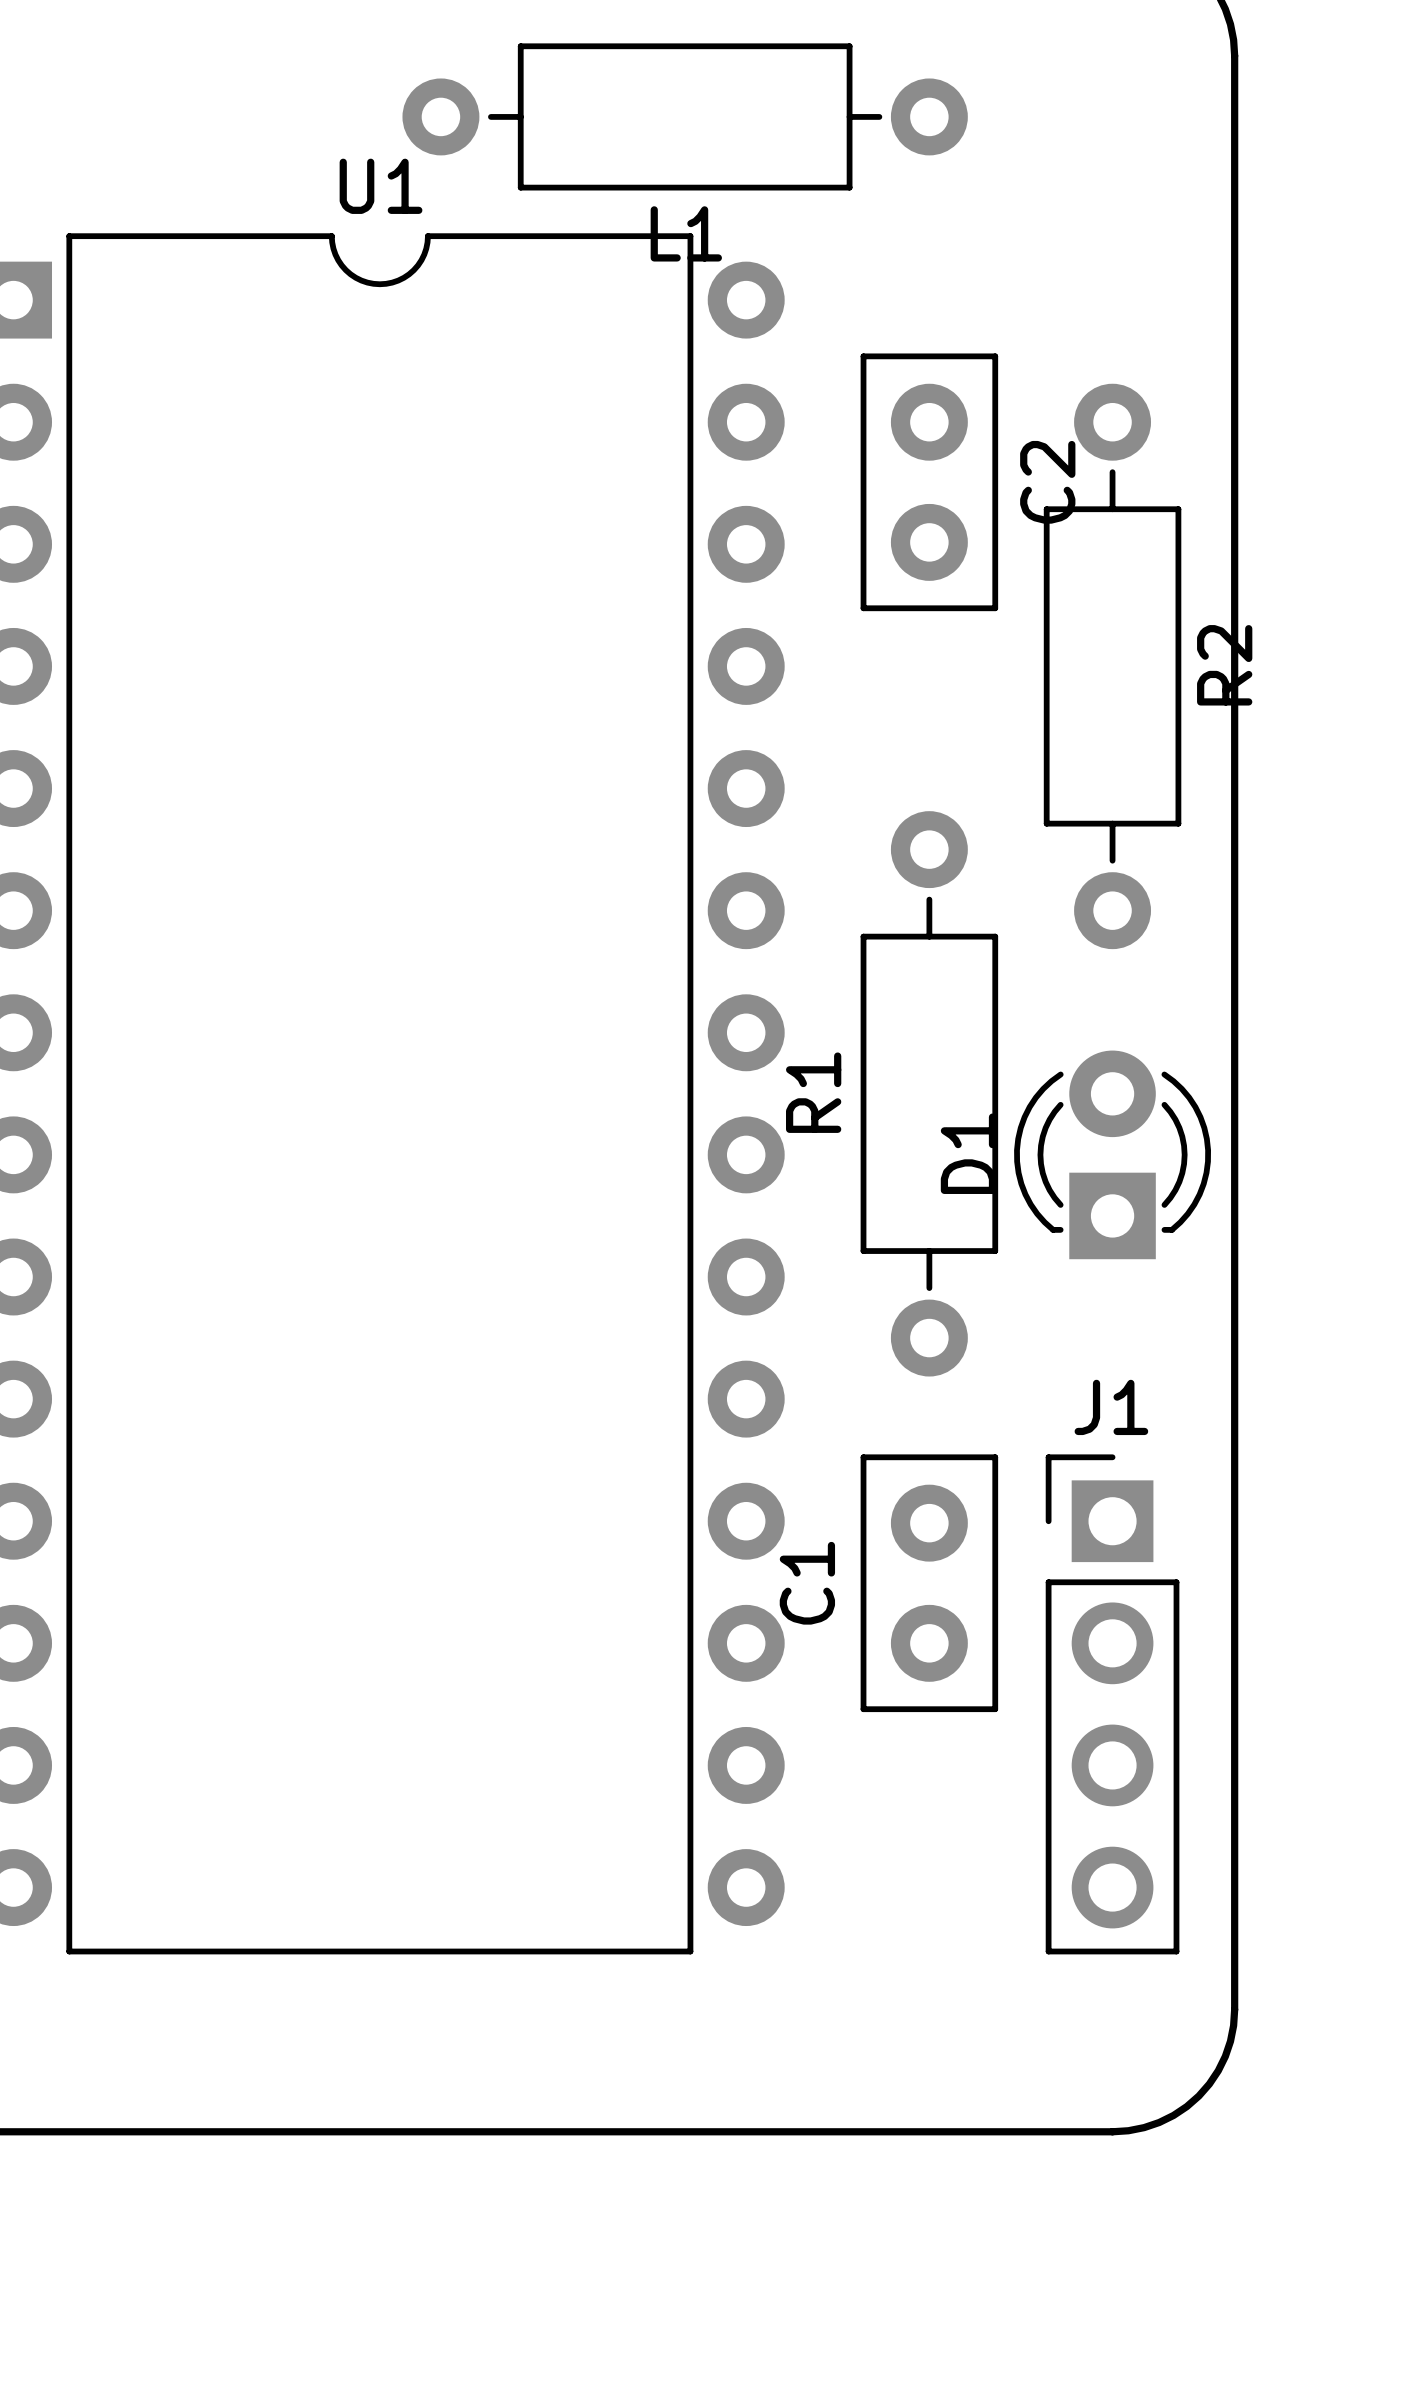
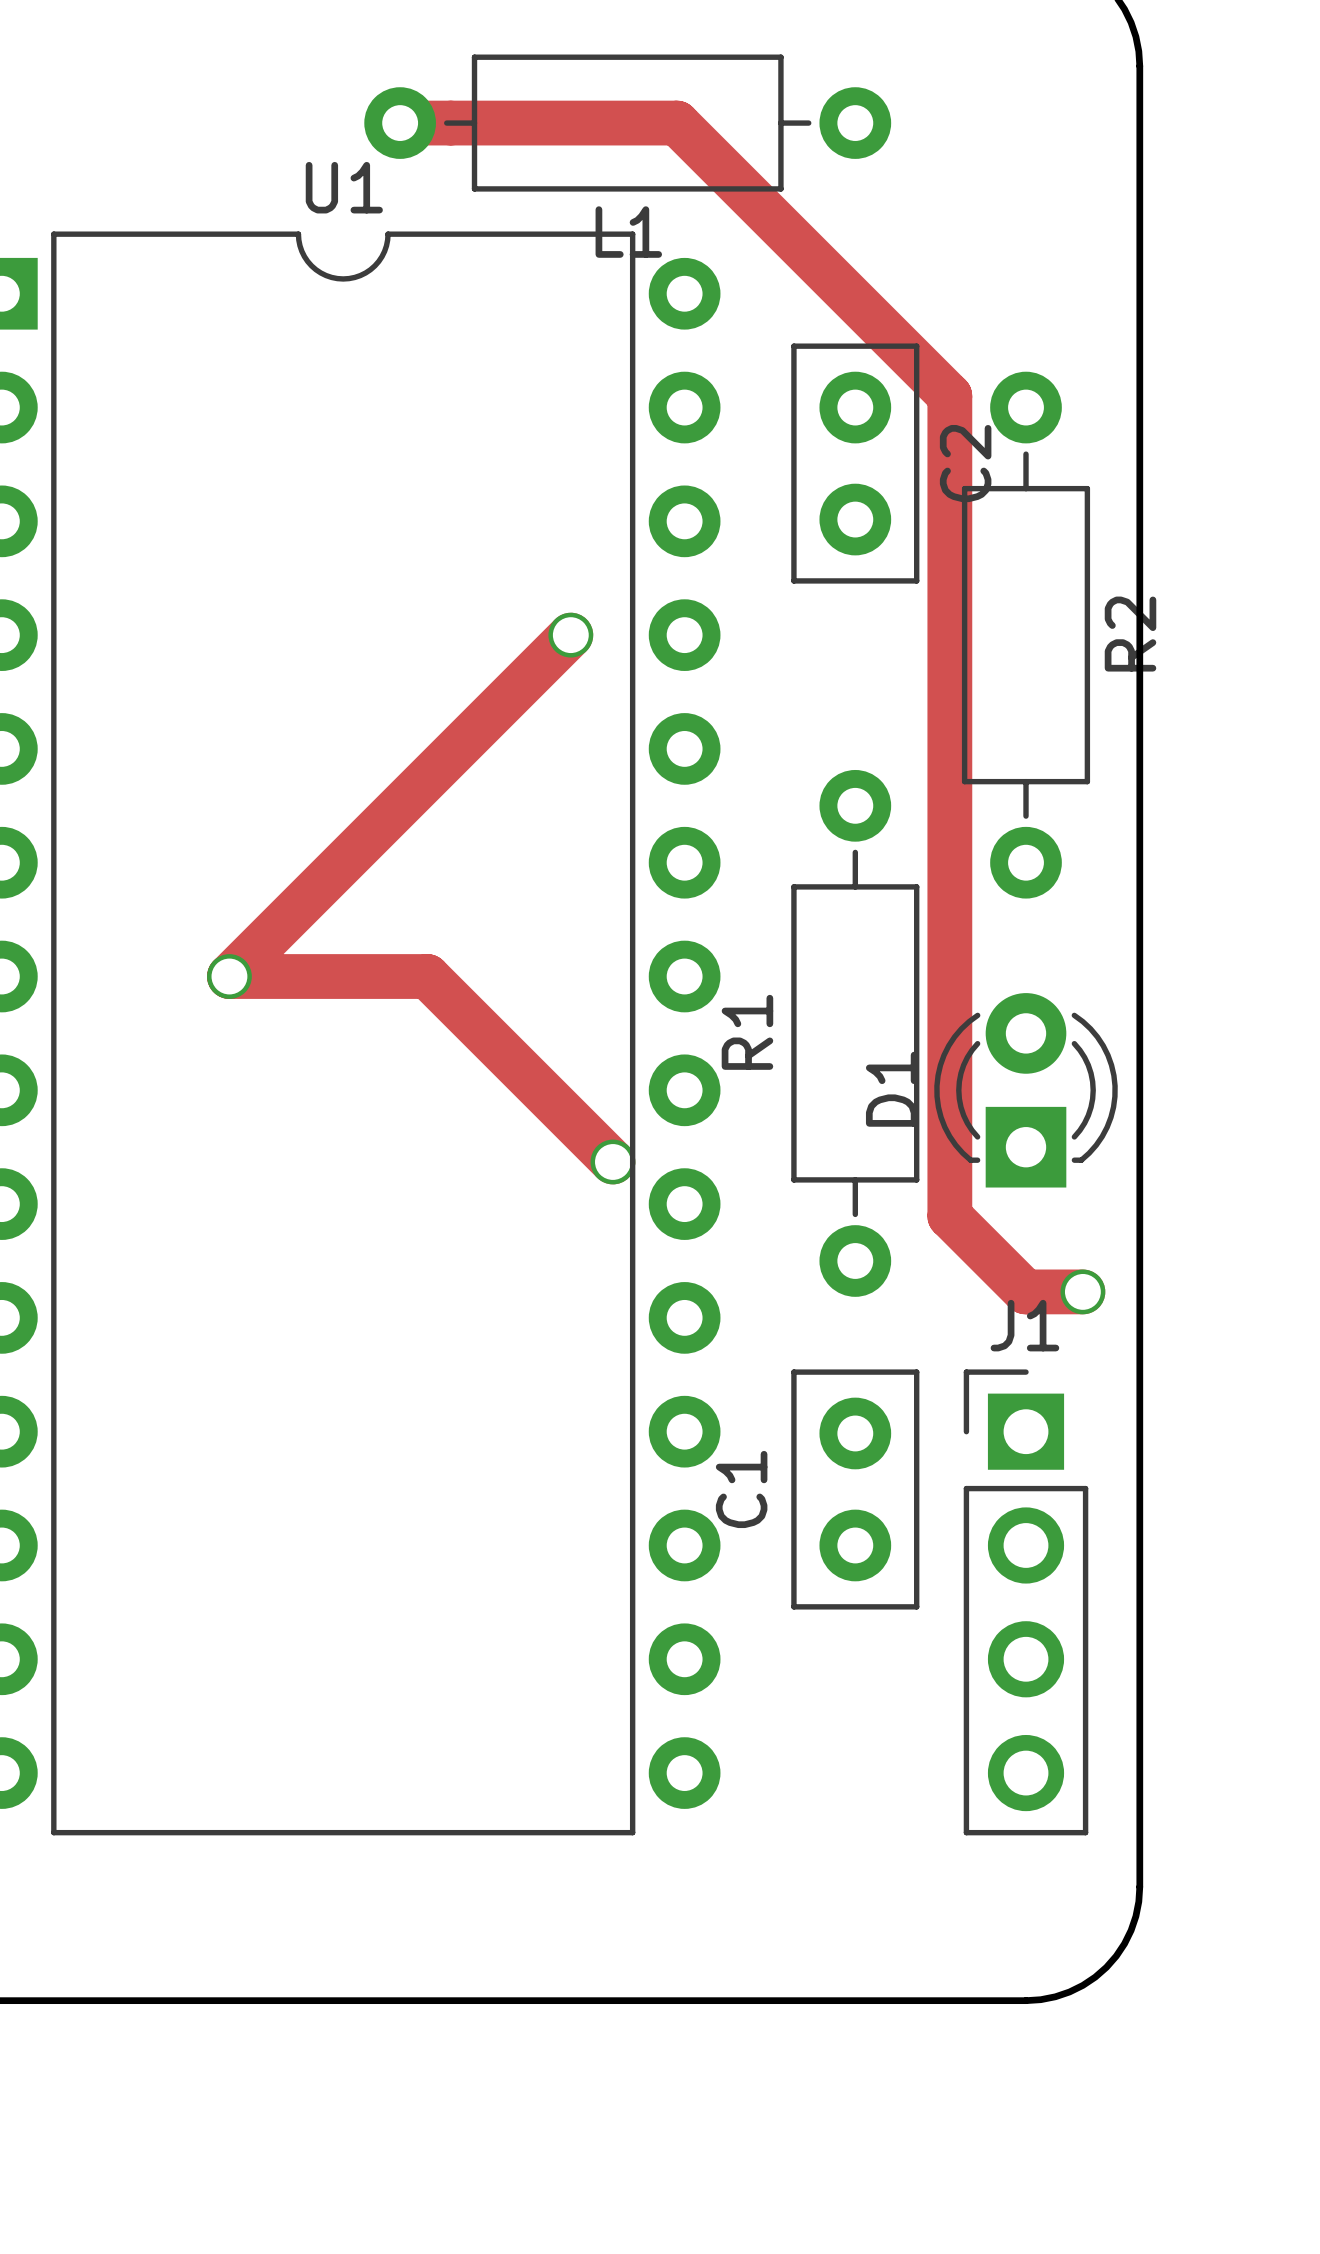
track: none -> (400, 123) (676, 123) (949, 395) (949, 1216) (1025, 1291) (1082, 1291)
track: none -> (570, 635) (229, 976) (427, 976) (612, 1161)
via: none -> (570, 635)
via: none -> (229, 976)
via: none -> (612, 1161)
via: none -> (1082, 1291)

